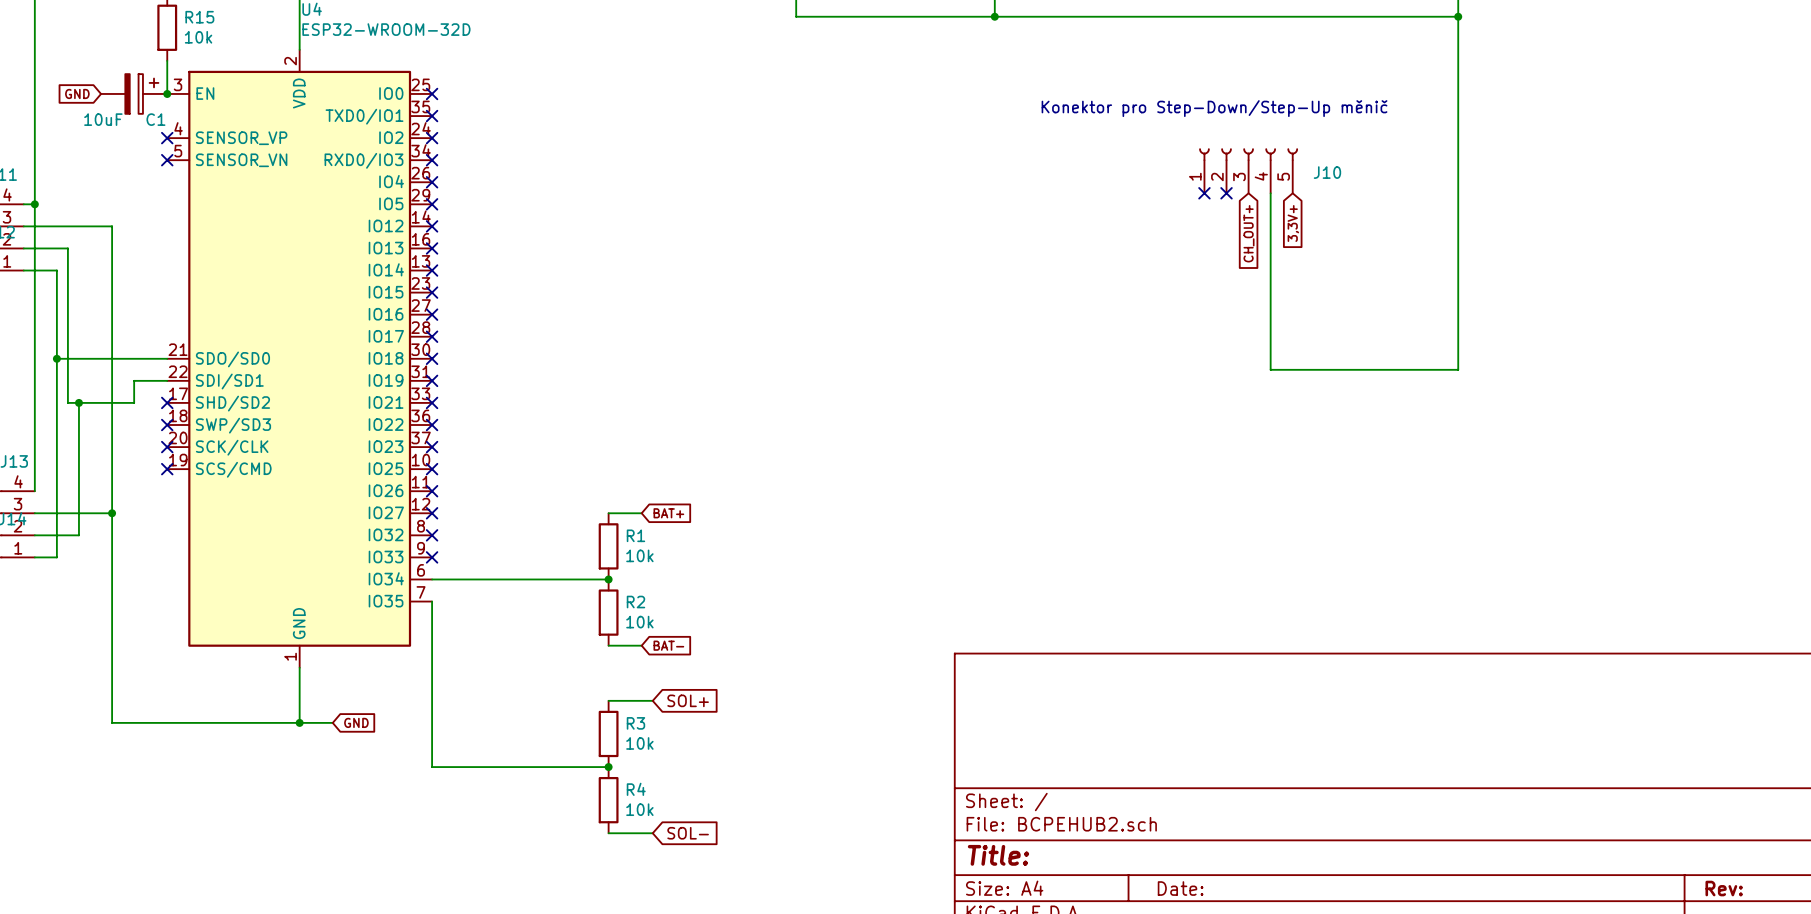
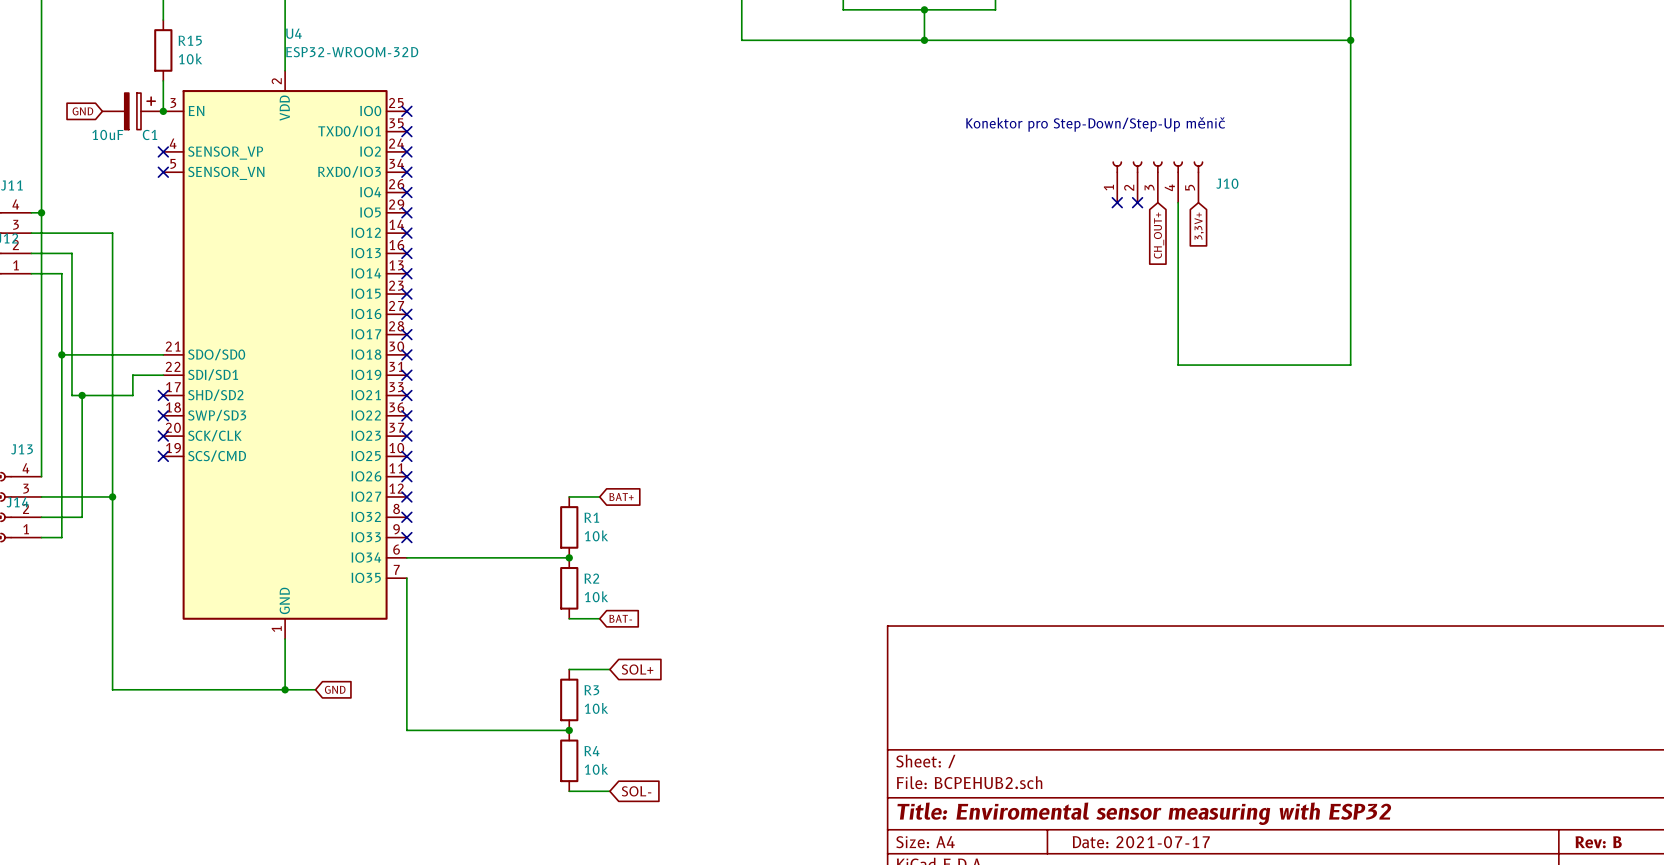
title block: Title: (998, 855) -> Title: Enviromental sensor measuring with ESP32 (1144, 813)
title block: Date: (1180, 888) -> Date: 2021-07-17 (1141, 842)
title block: Rev: (1724, 888) -> Rev: B (1598, 842)

